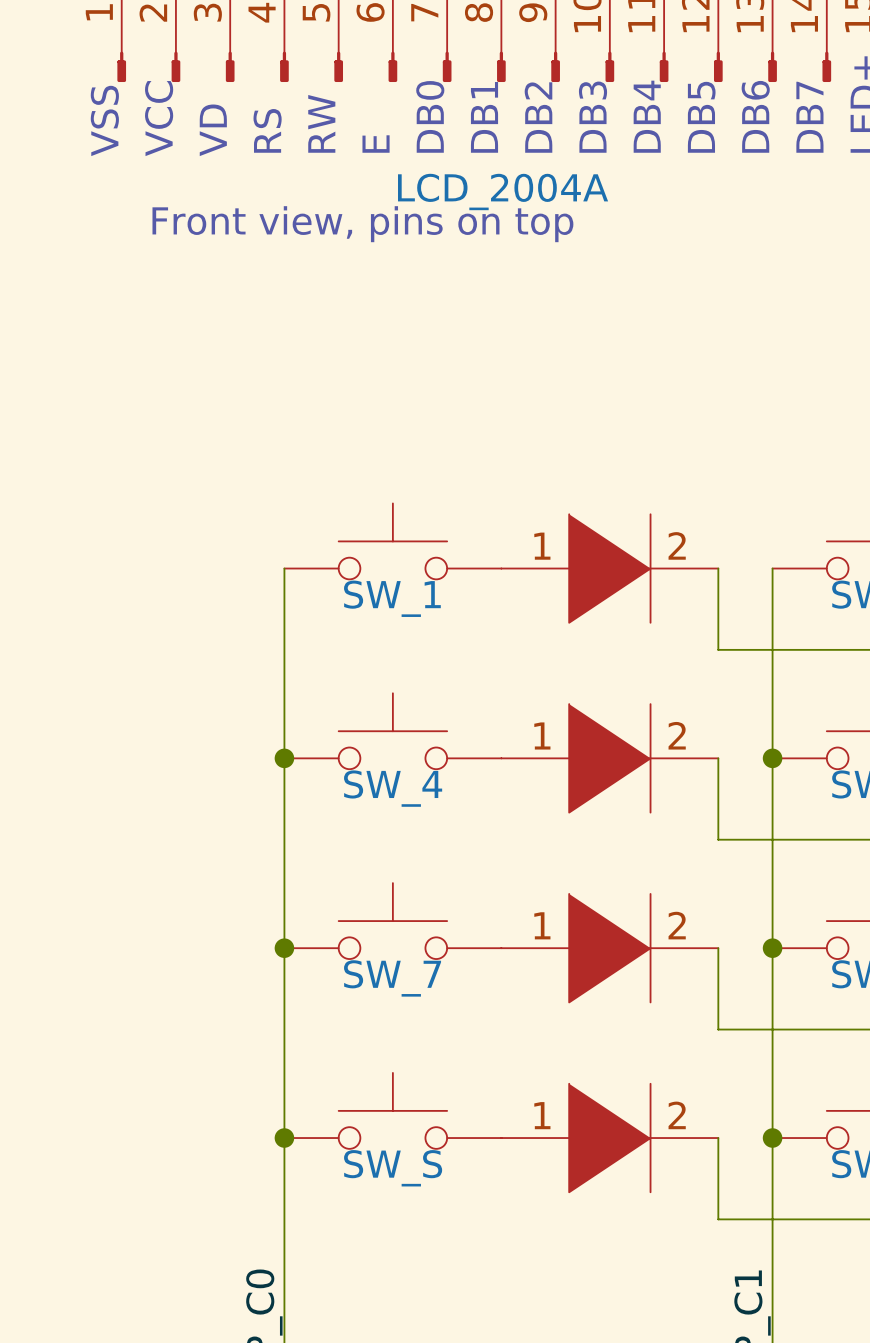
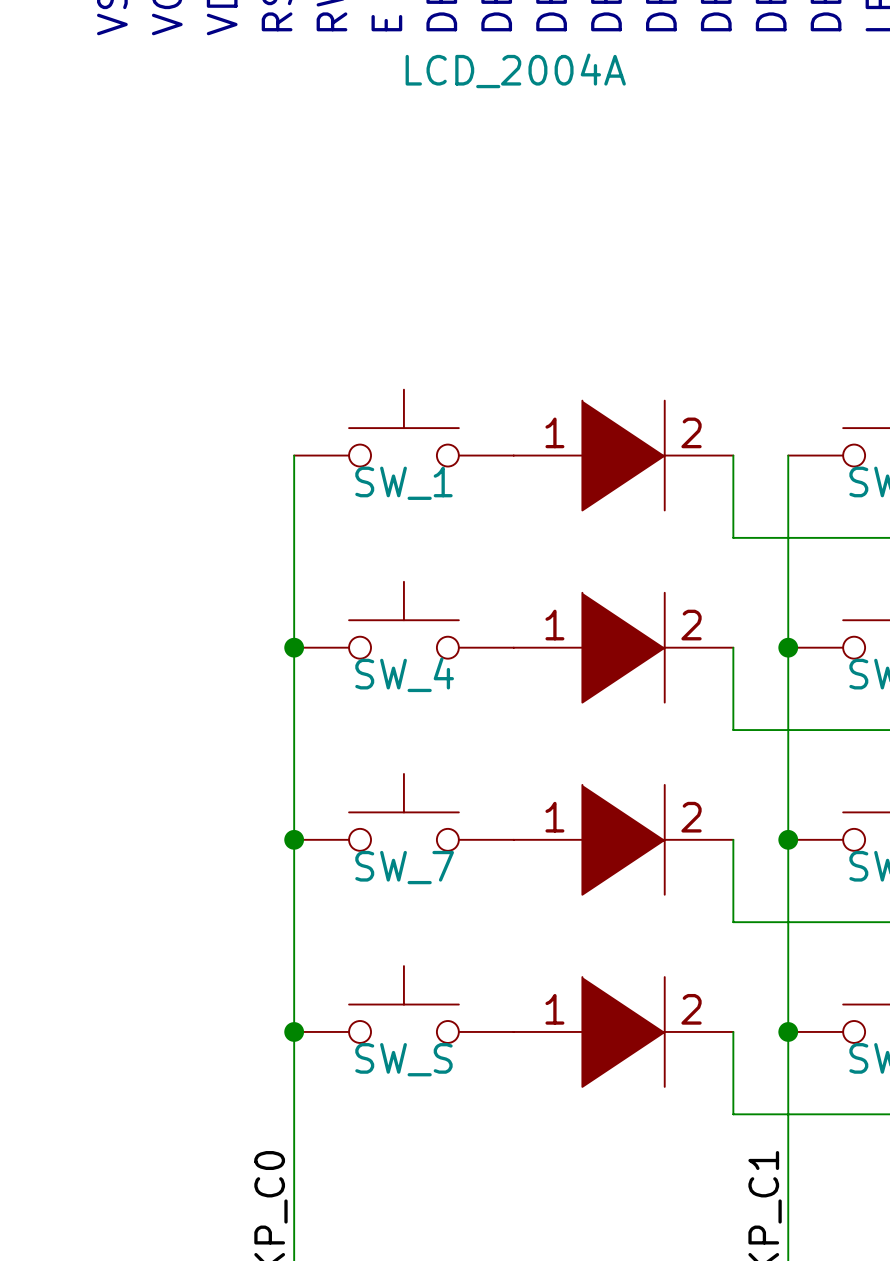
text: Front view, pins on top (362, 224) -> none

